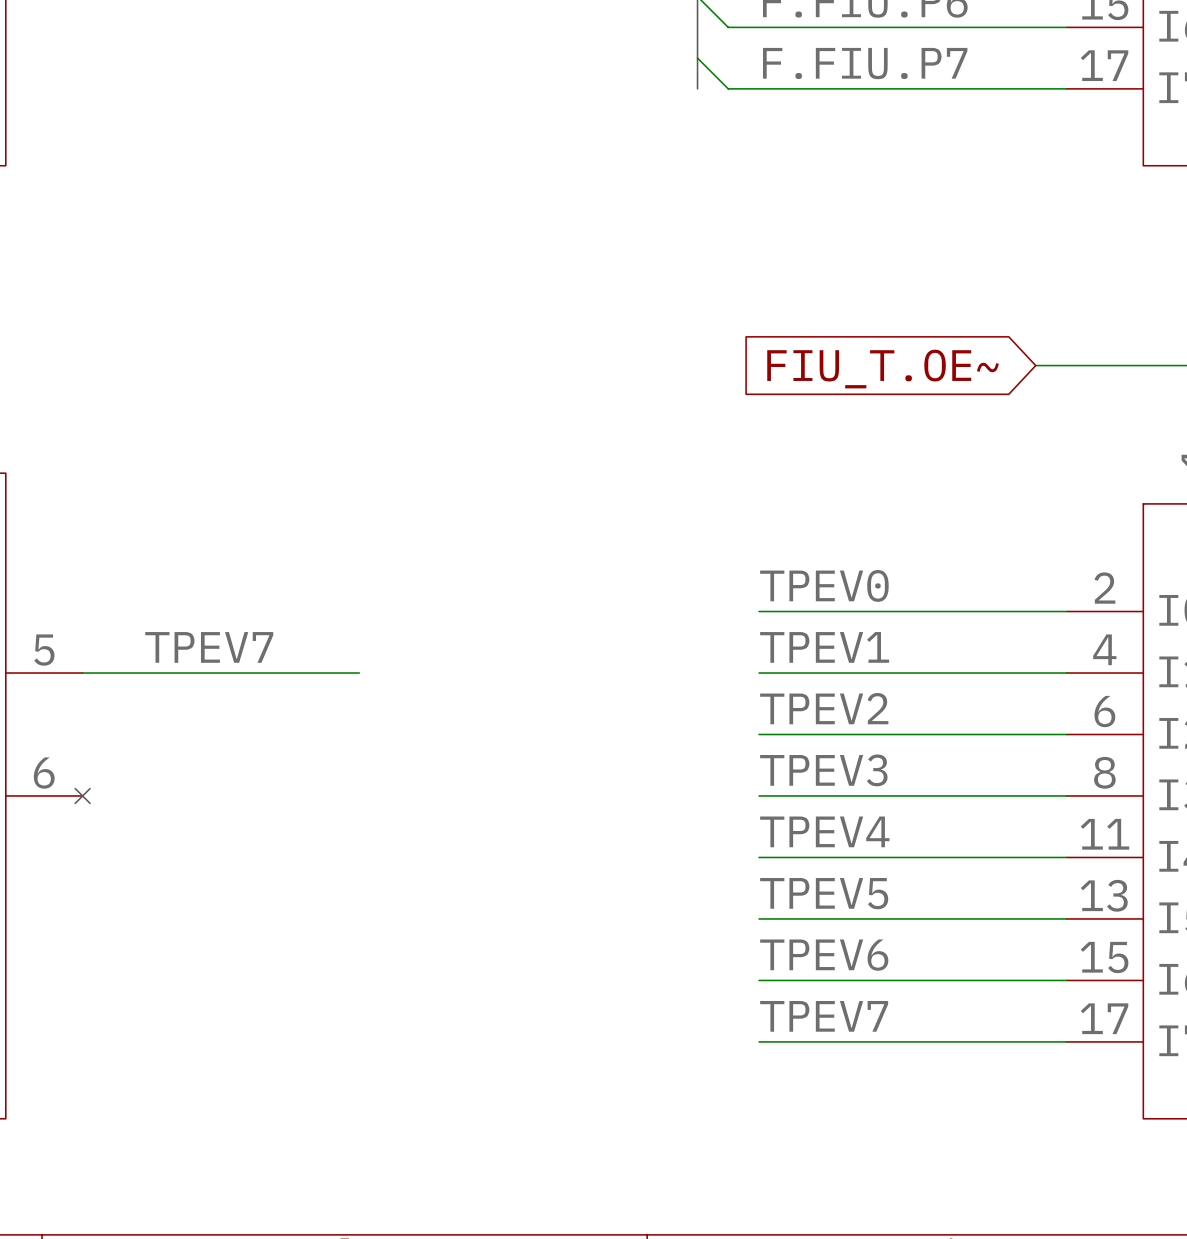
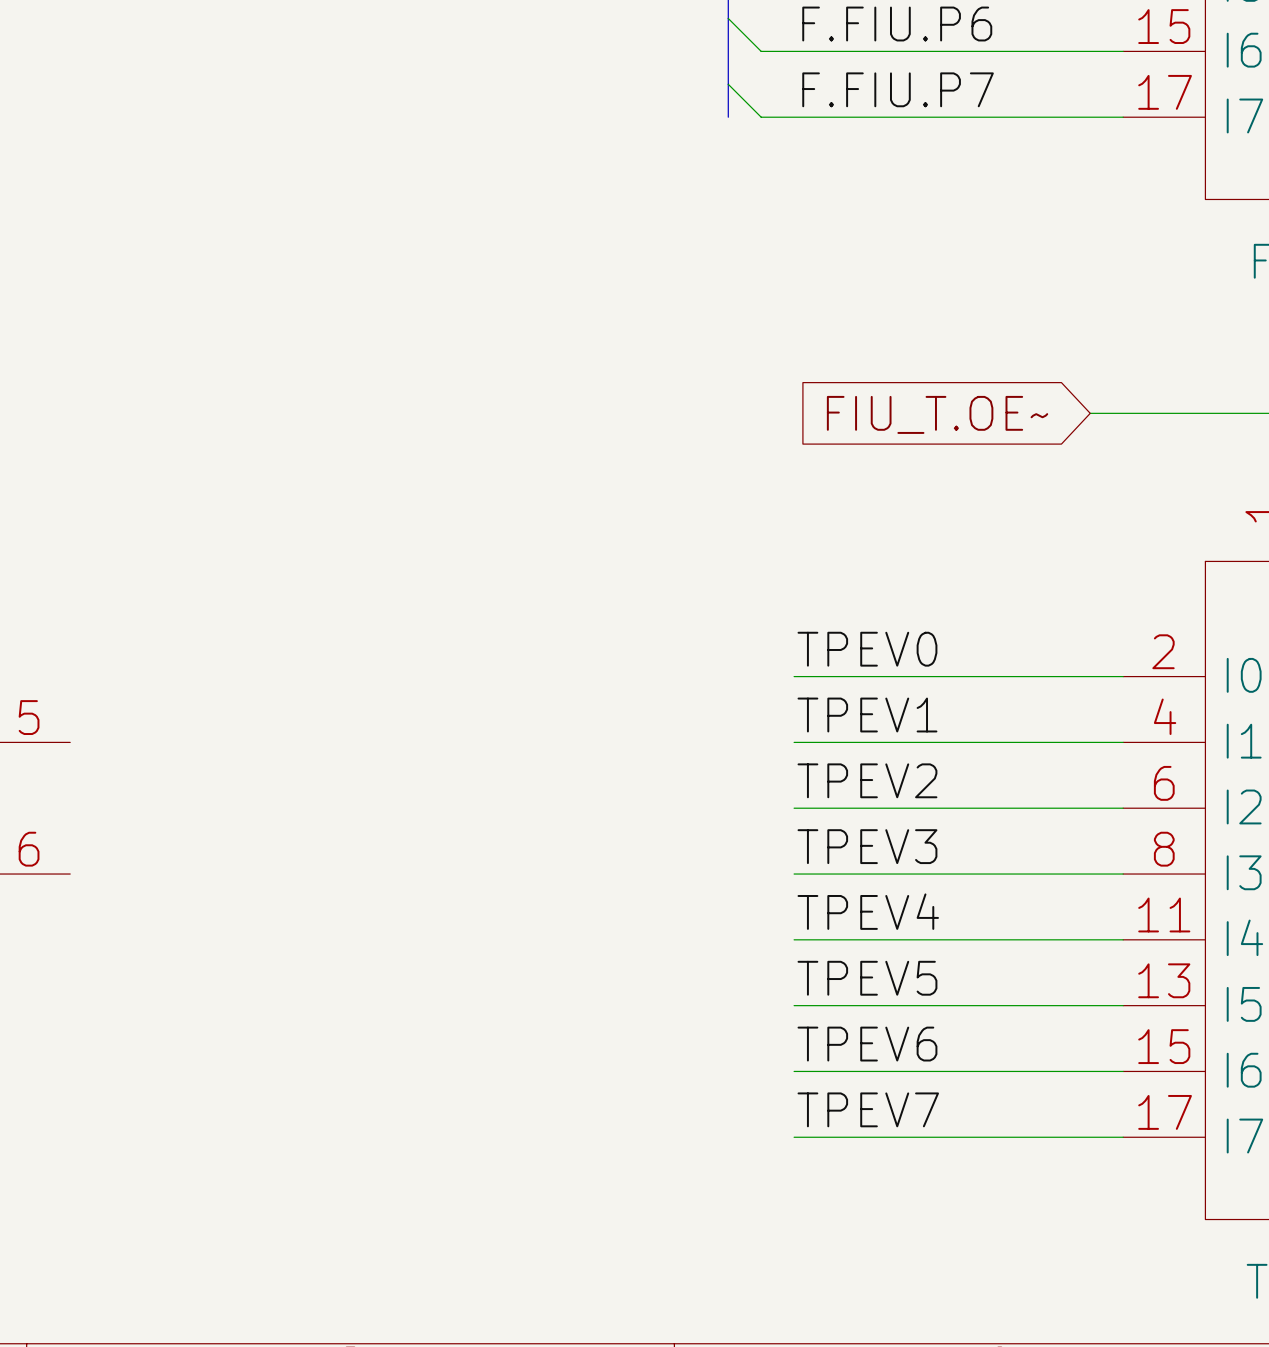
label: TPEV7 (209, 647) -> none
wire: (82, 673) (359, 673) -> none
no-connect mark: (82, 795) -> none

